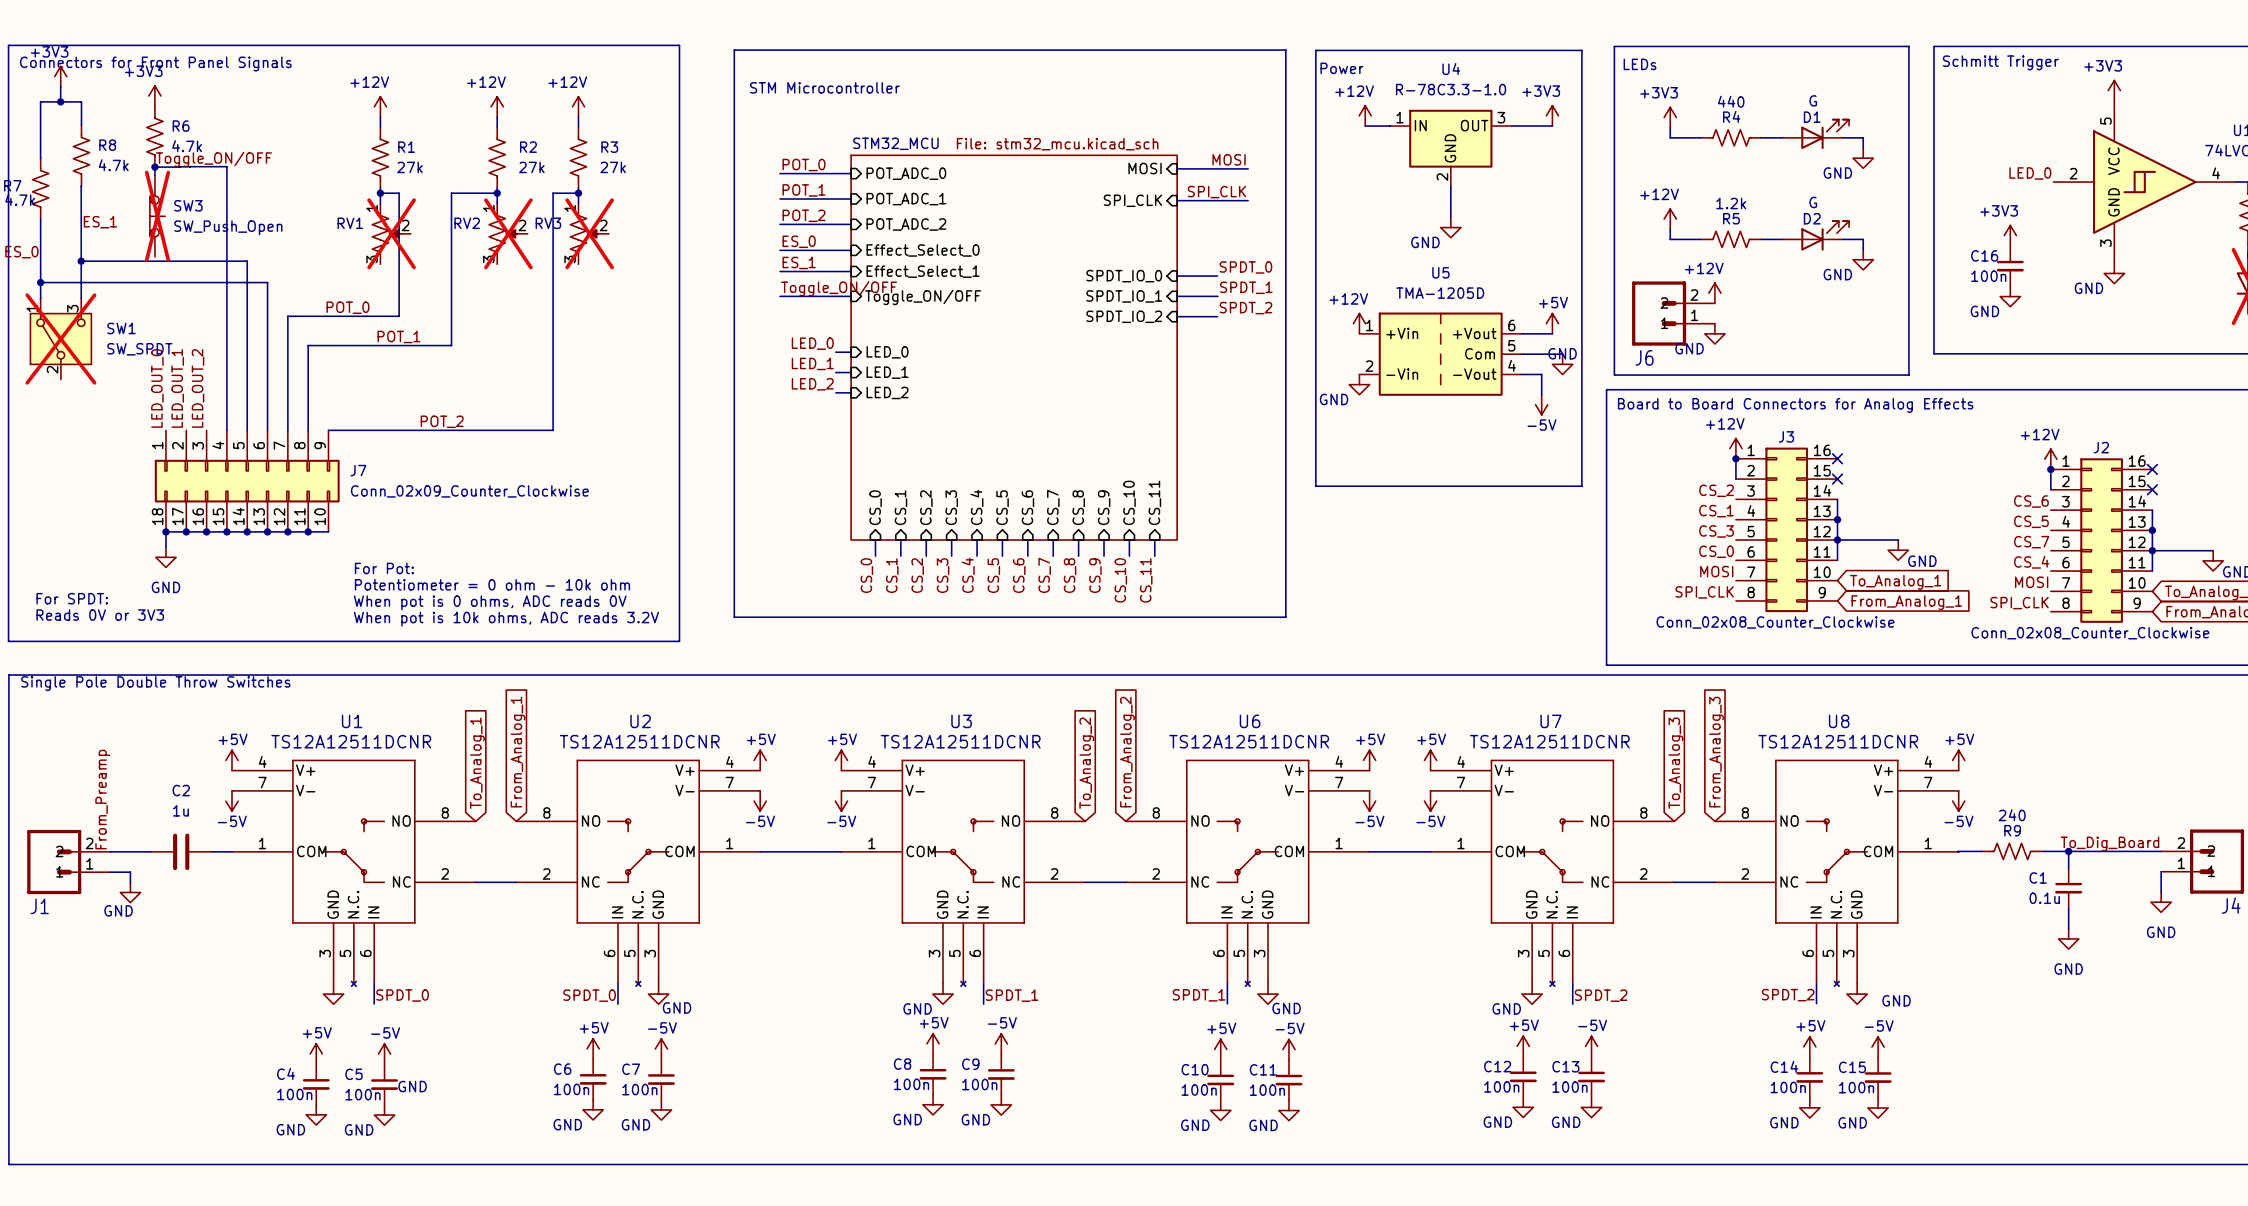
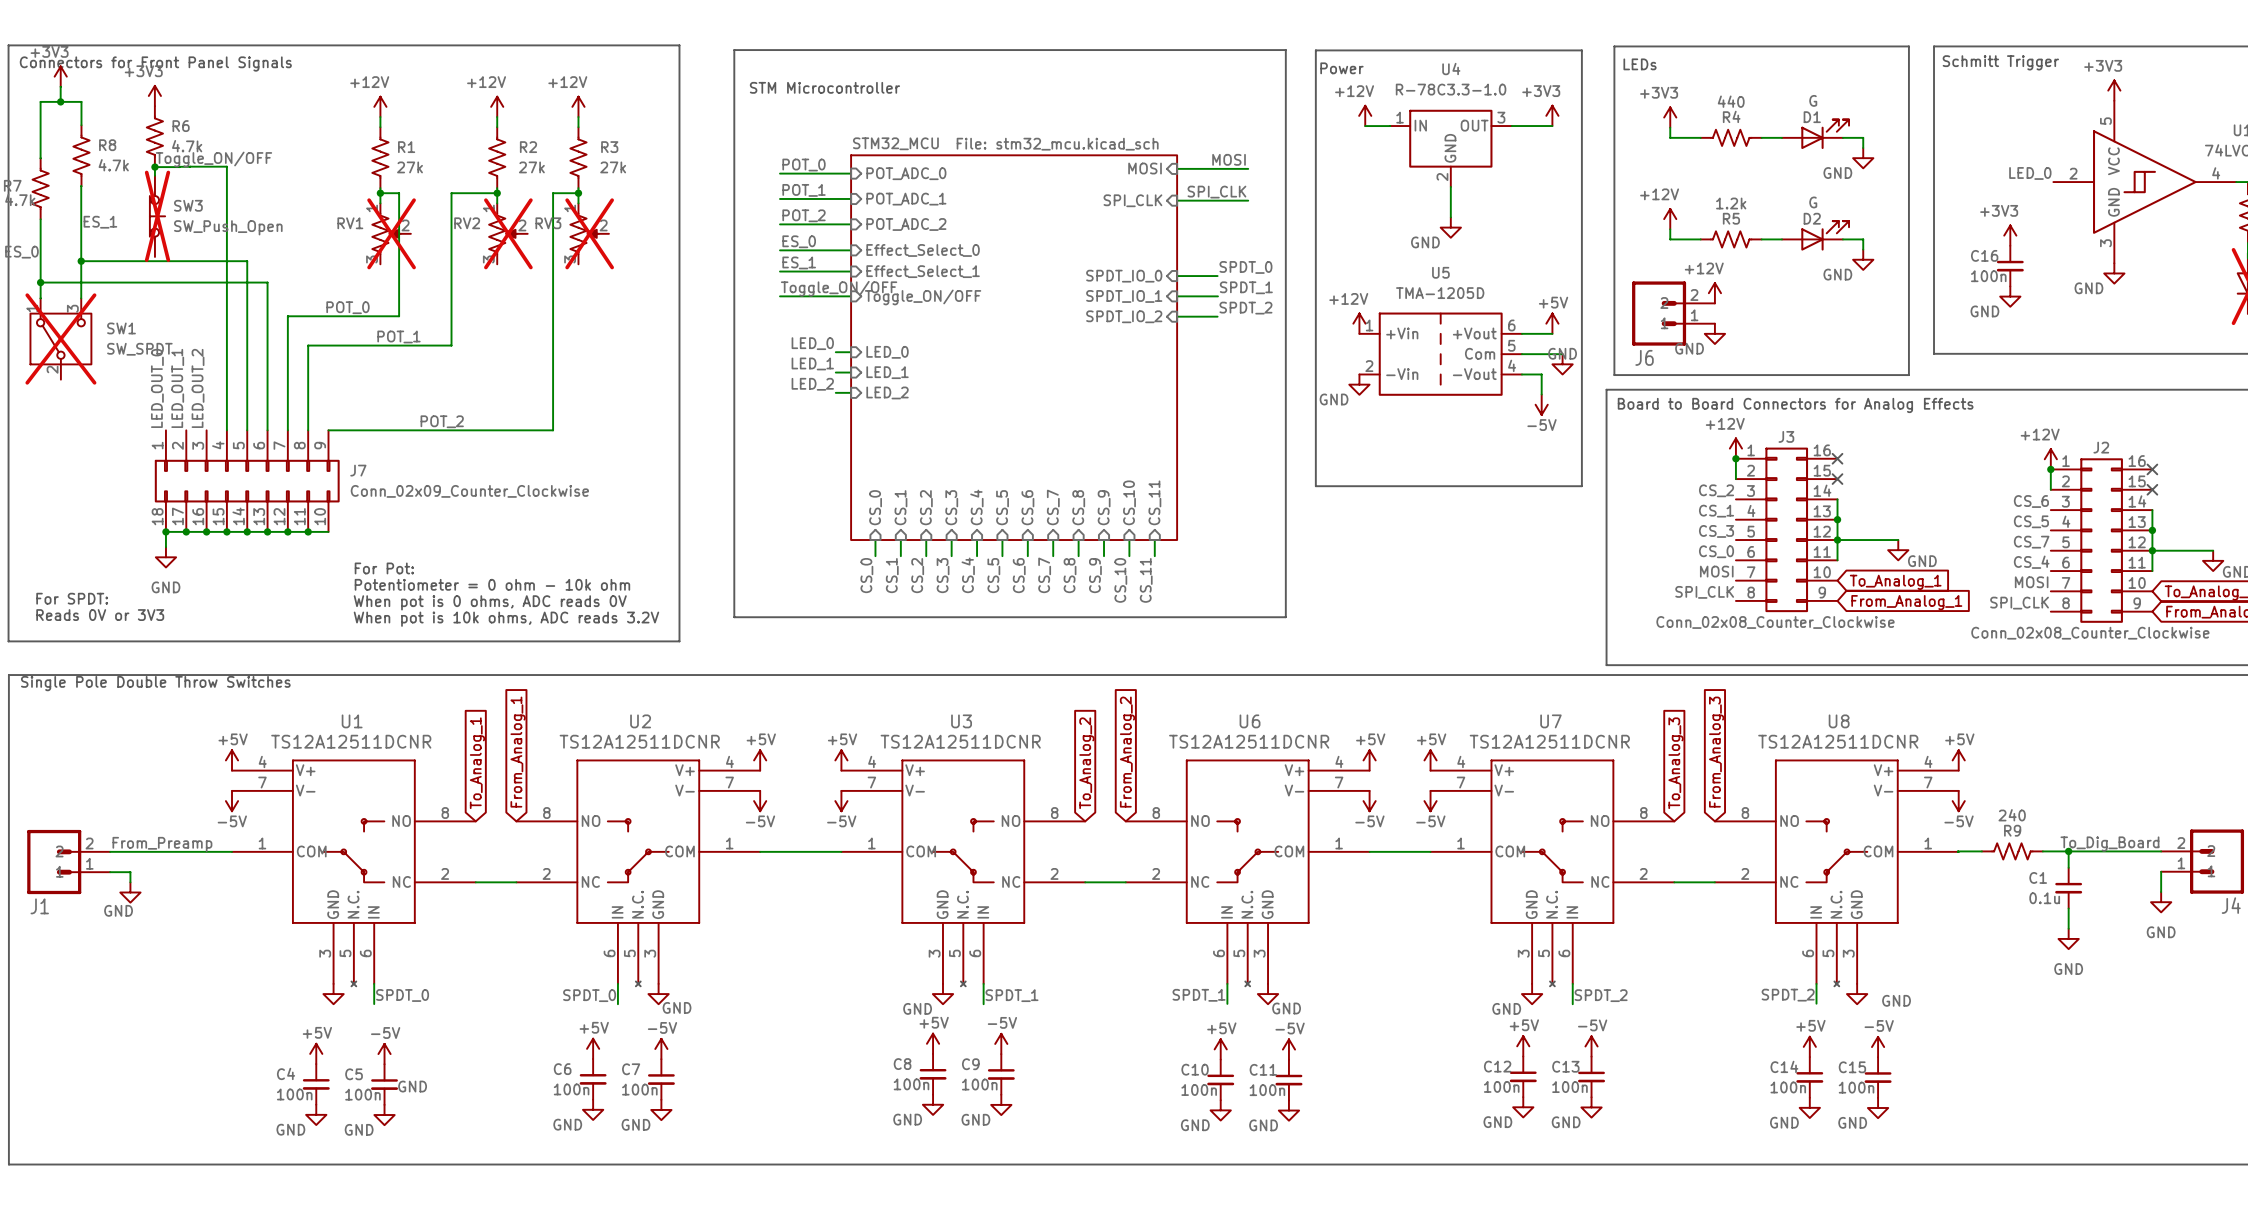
label rotation: 0° (102, 799) -> 90° clockwise (162, 844)
C2: 1u (181, 851) -> none

